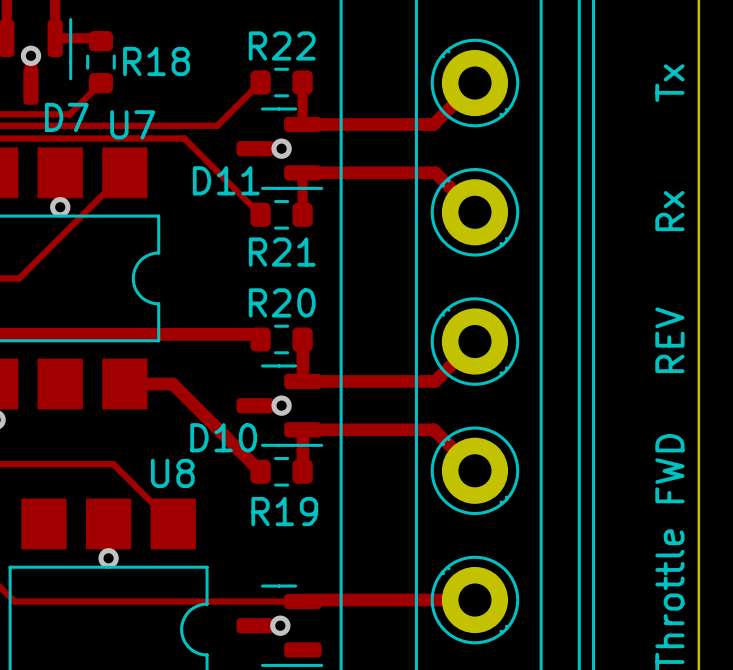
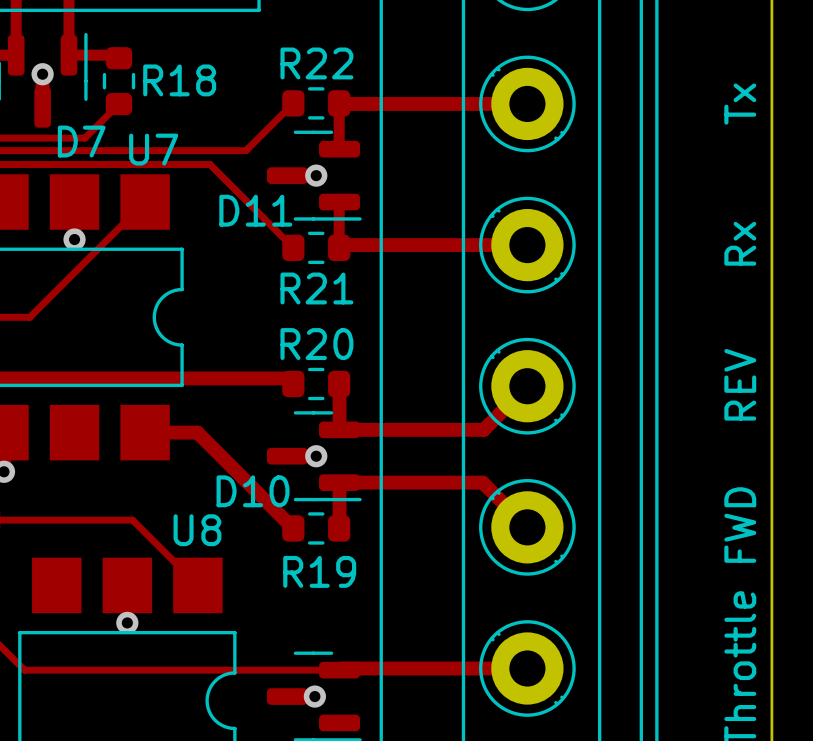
top track: (474, 83) (433, 124) (302, 124) -> (527, 103) (339, 103)
top track: (302, 172) (435, 172) (474, 212) -> (341, 245) (527, 245)

